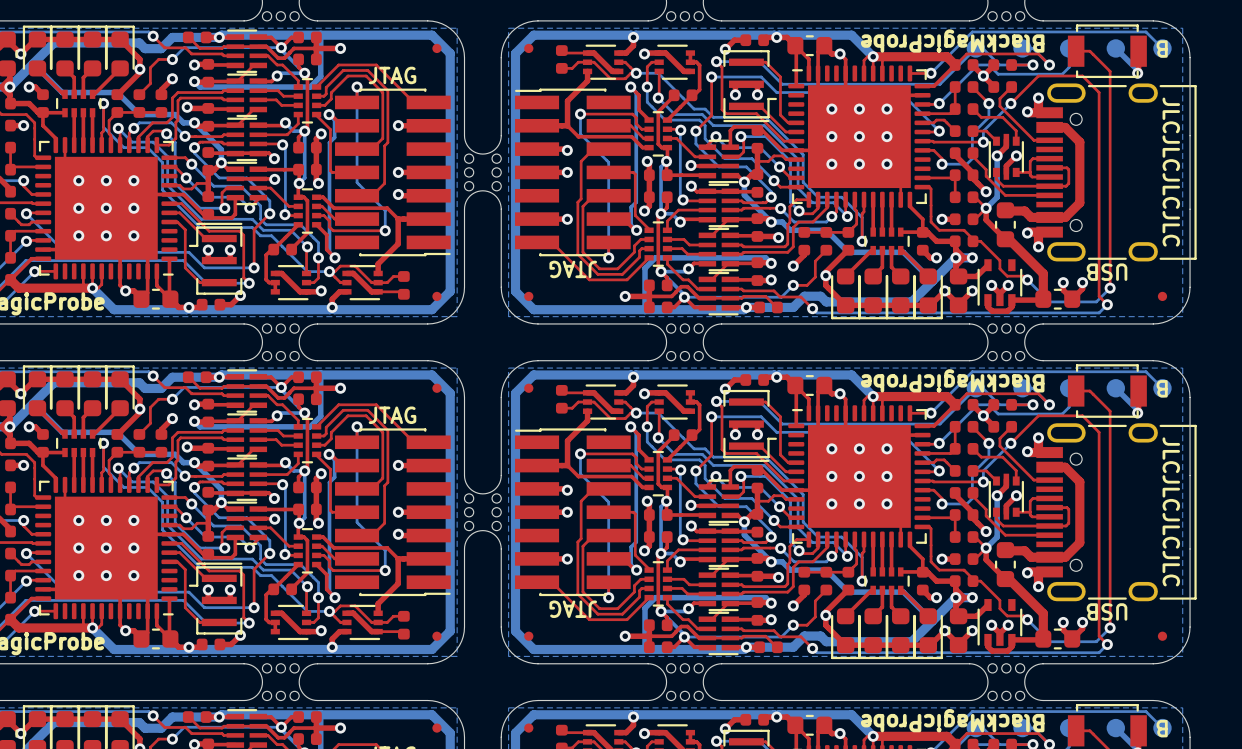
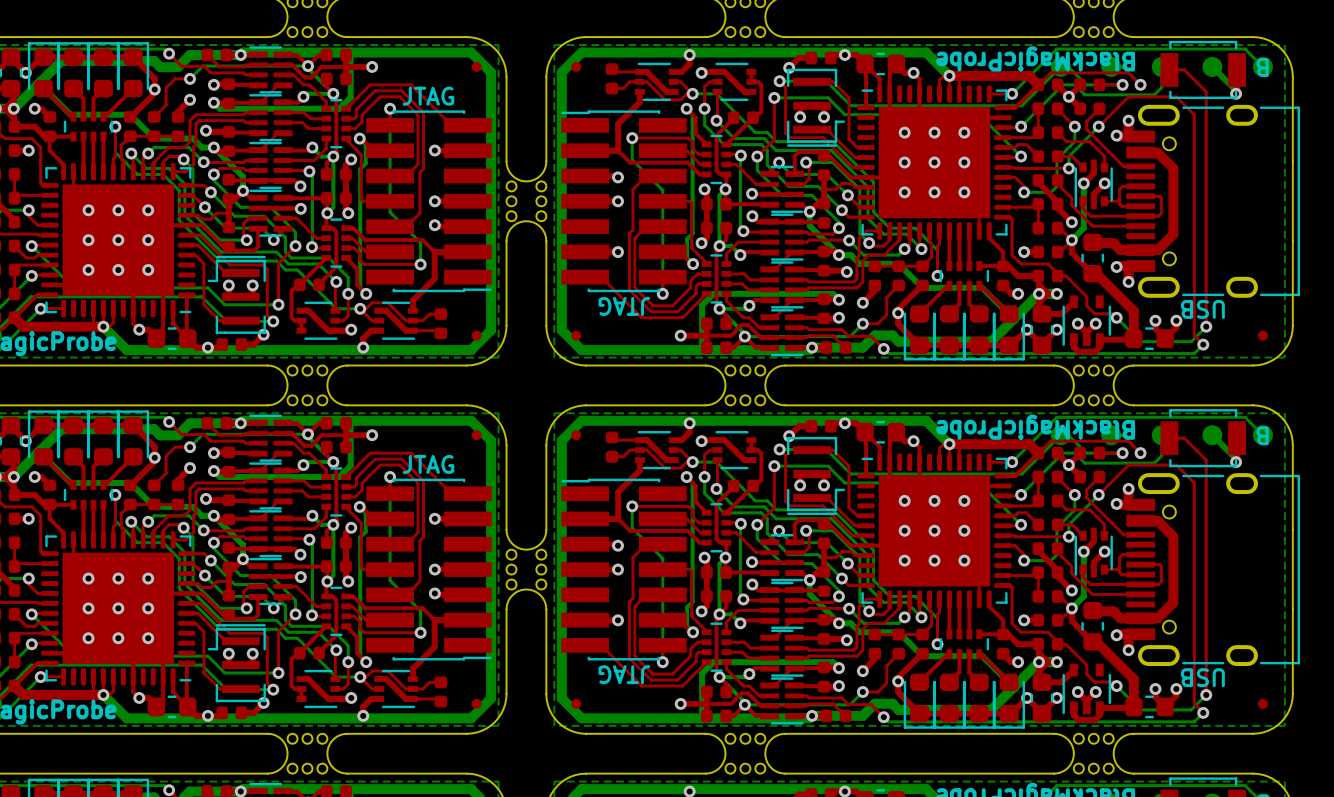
text: JLCJLCJLCJLC (1171, 172) -> none
text: JLCJLCJLCJLC (1171, 511) -> none

